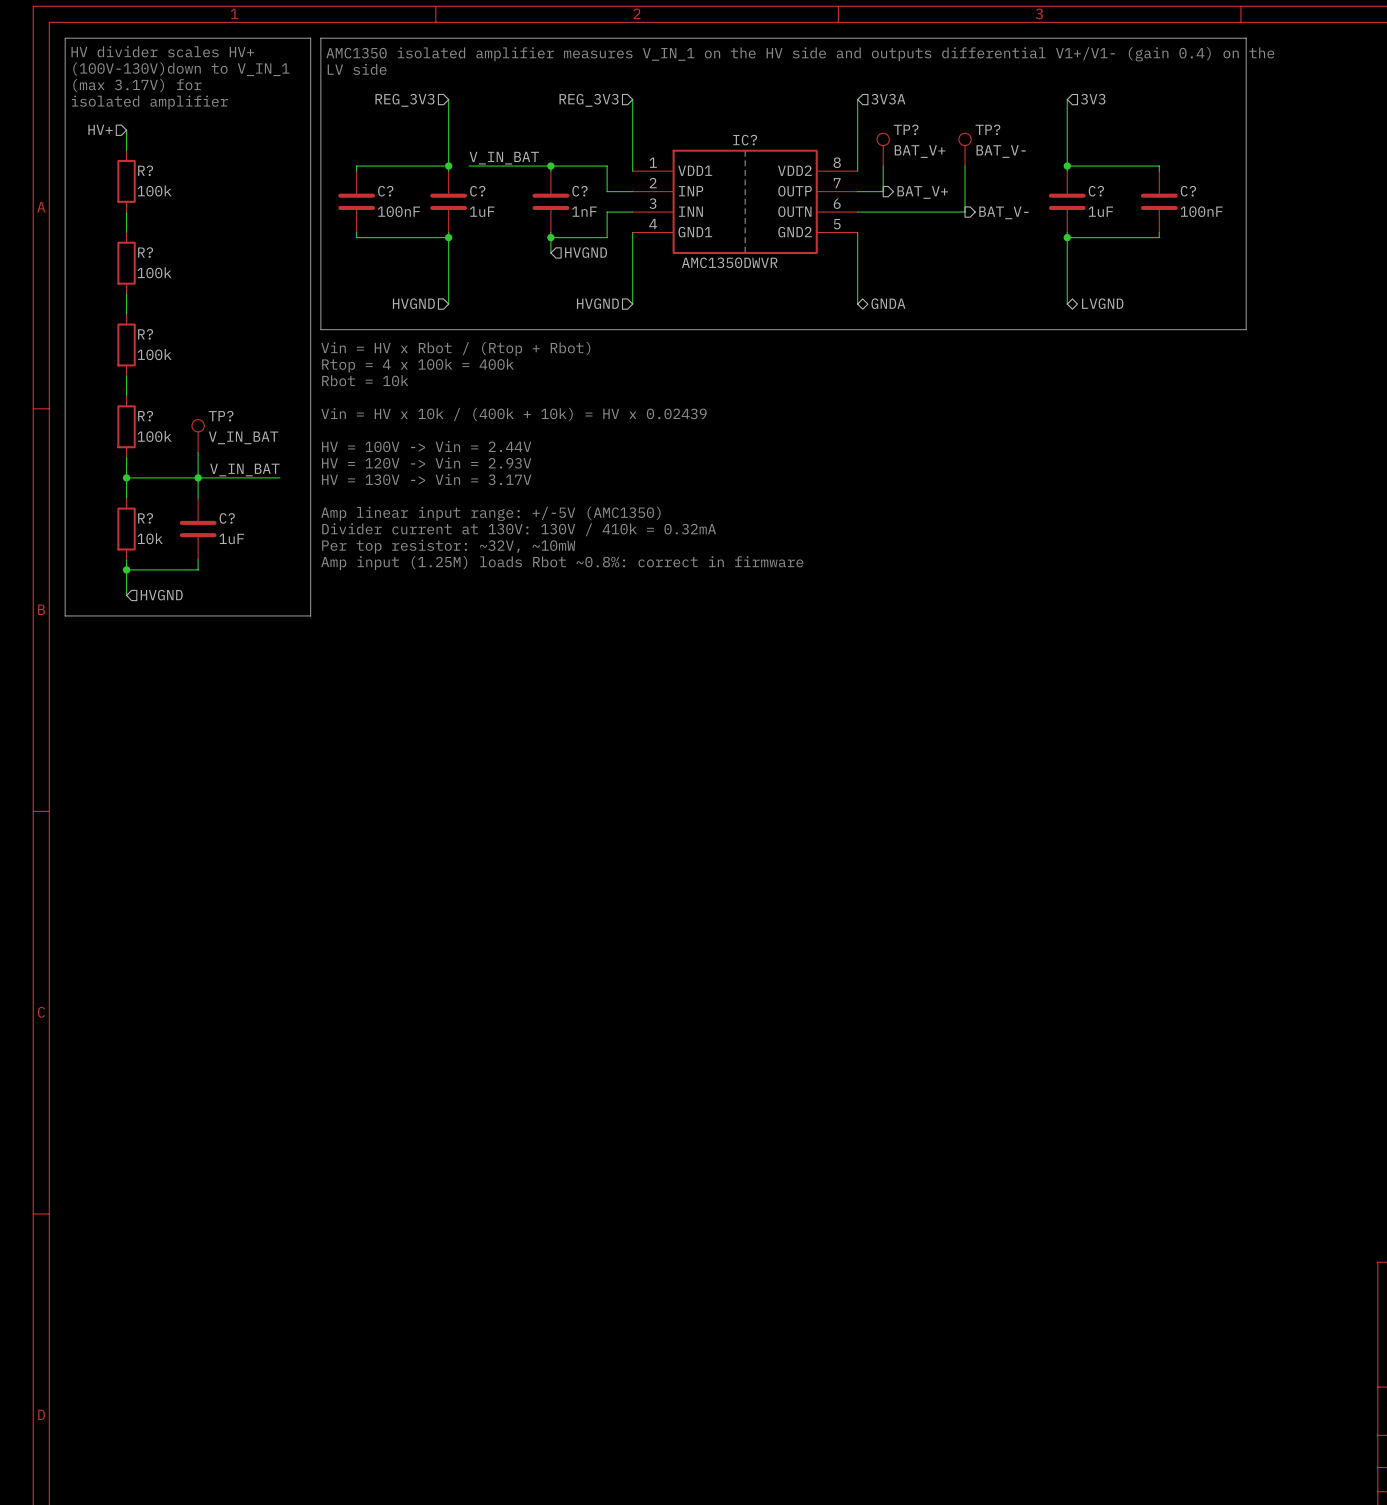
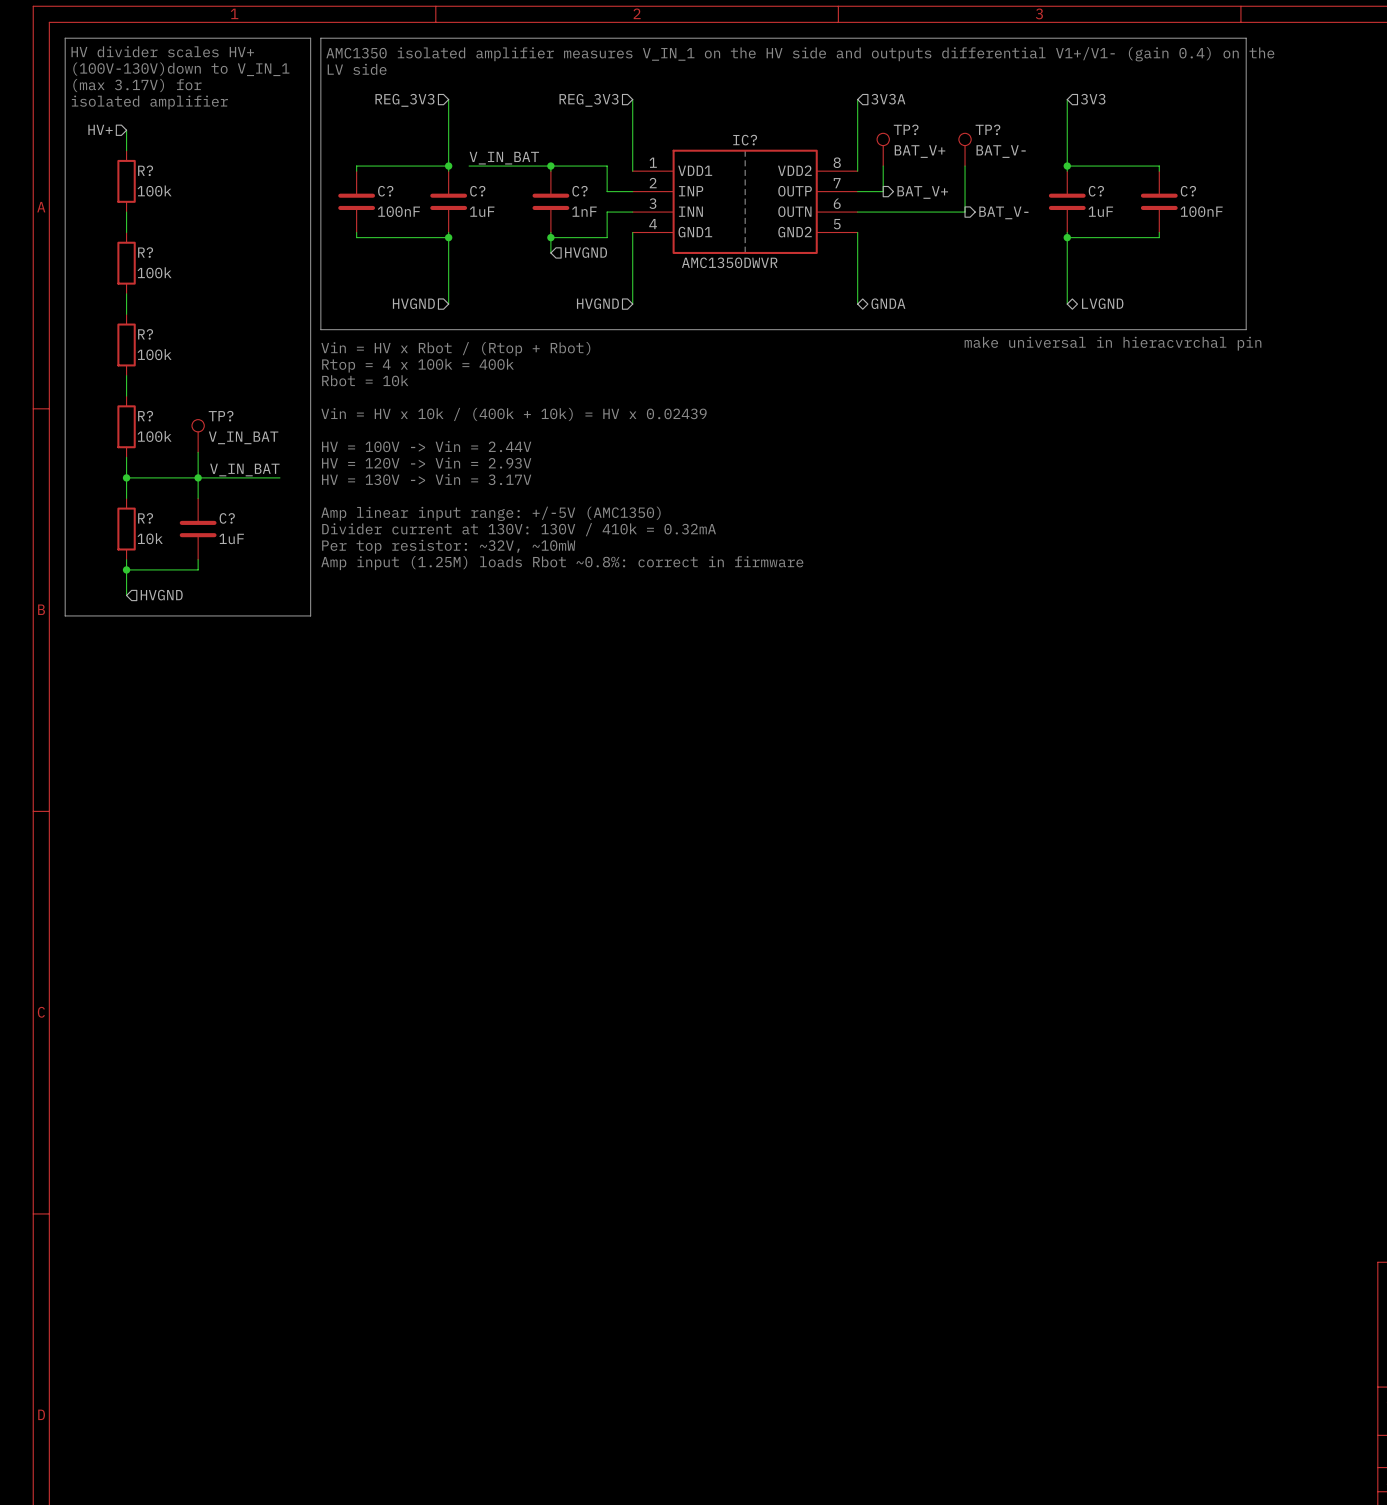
text: none -> make universal in hieracvrchal pin (1113, 343)

